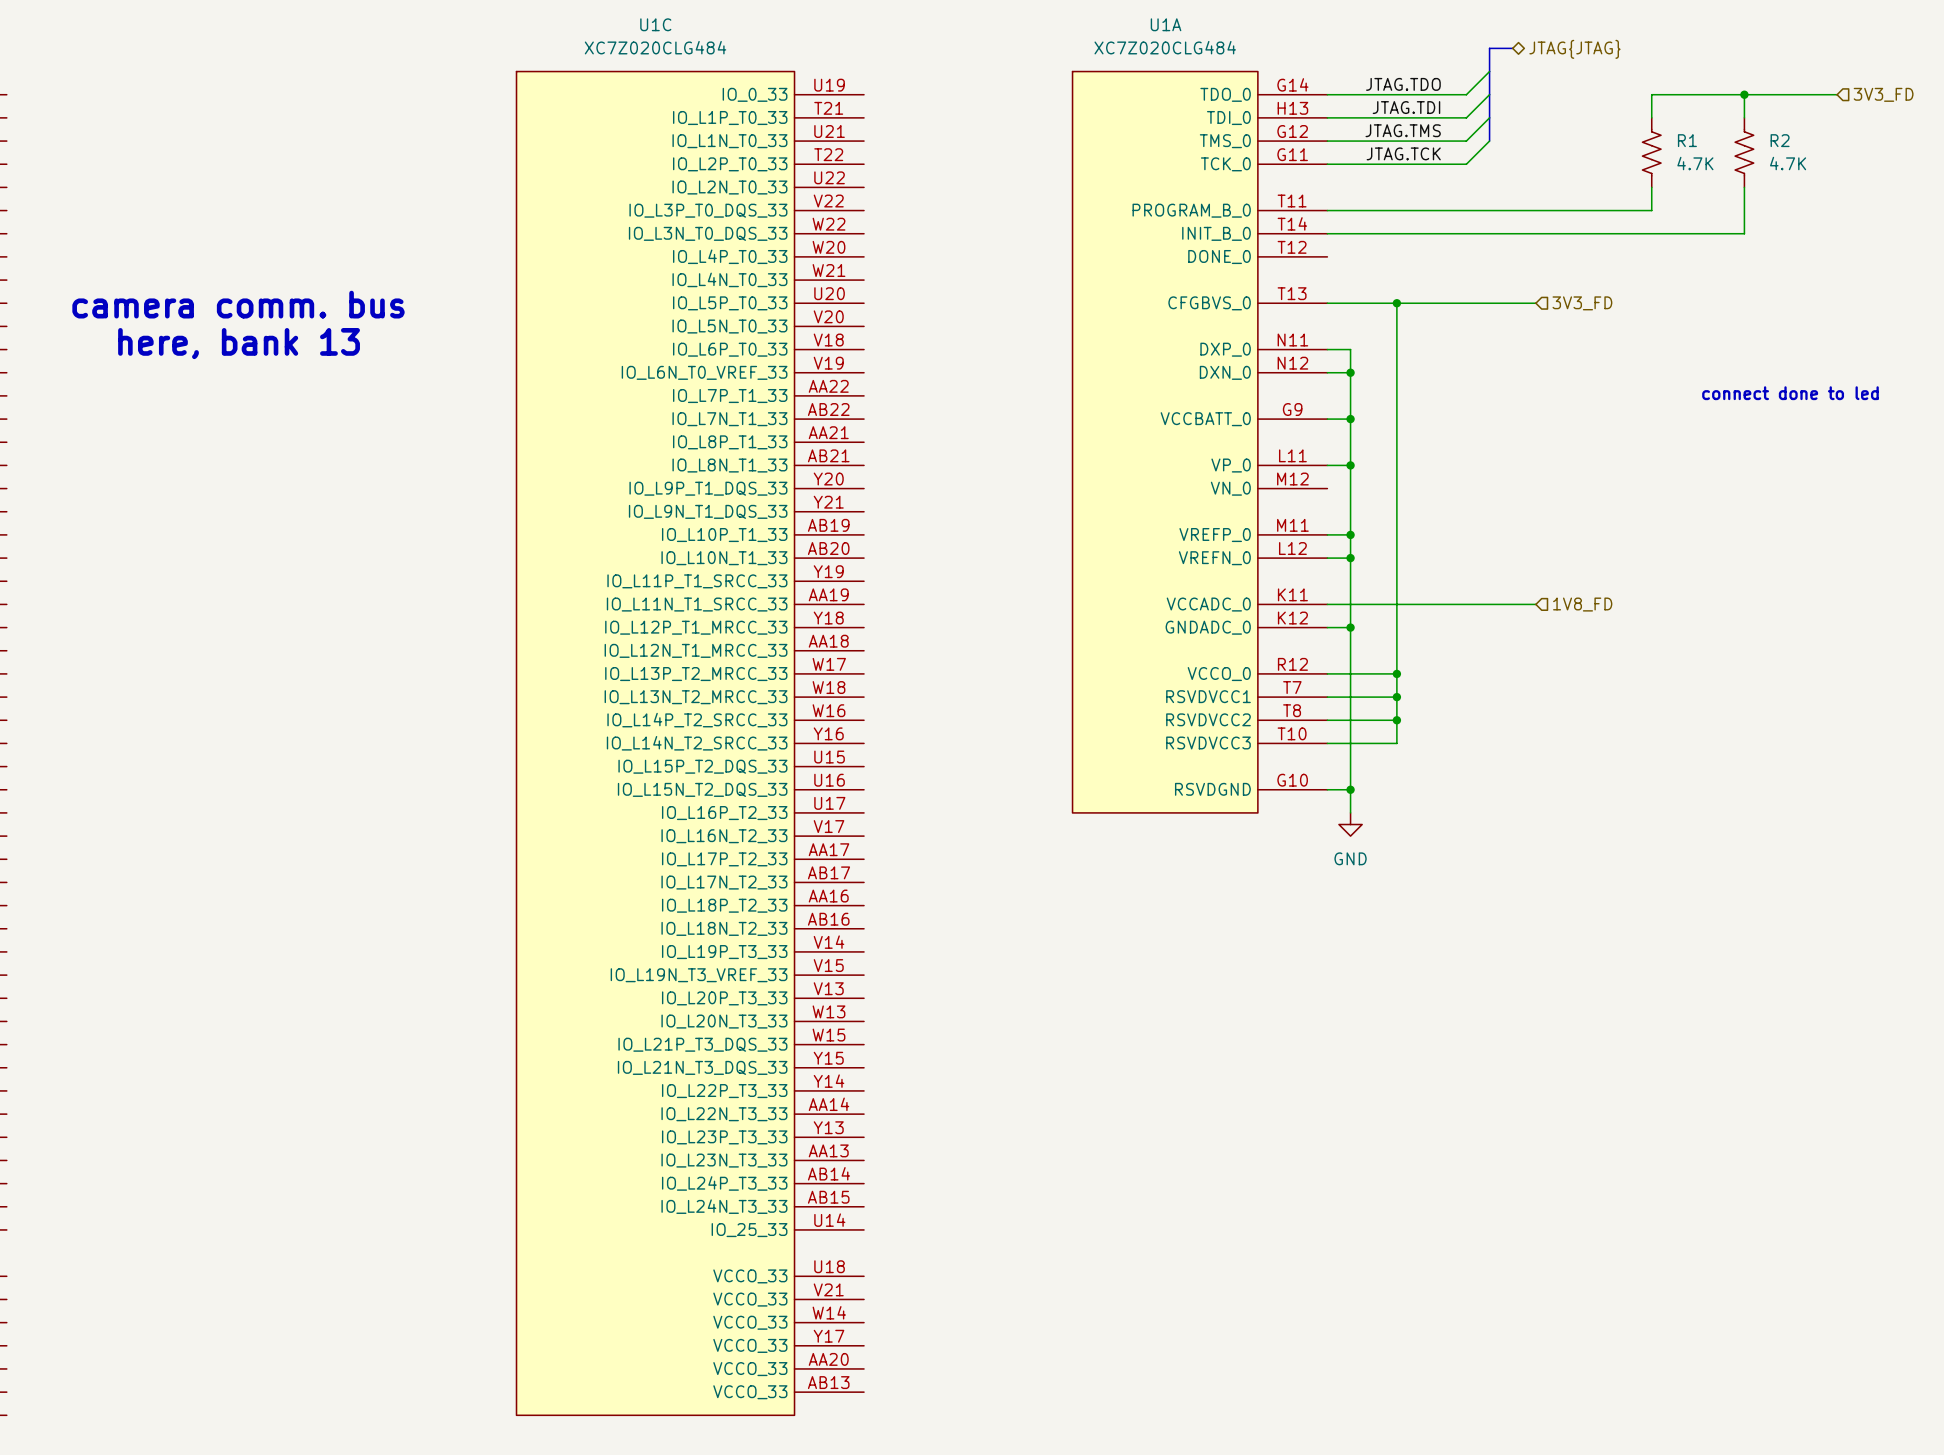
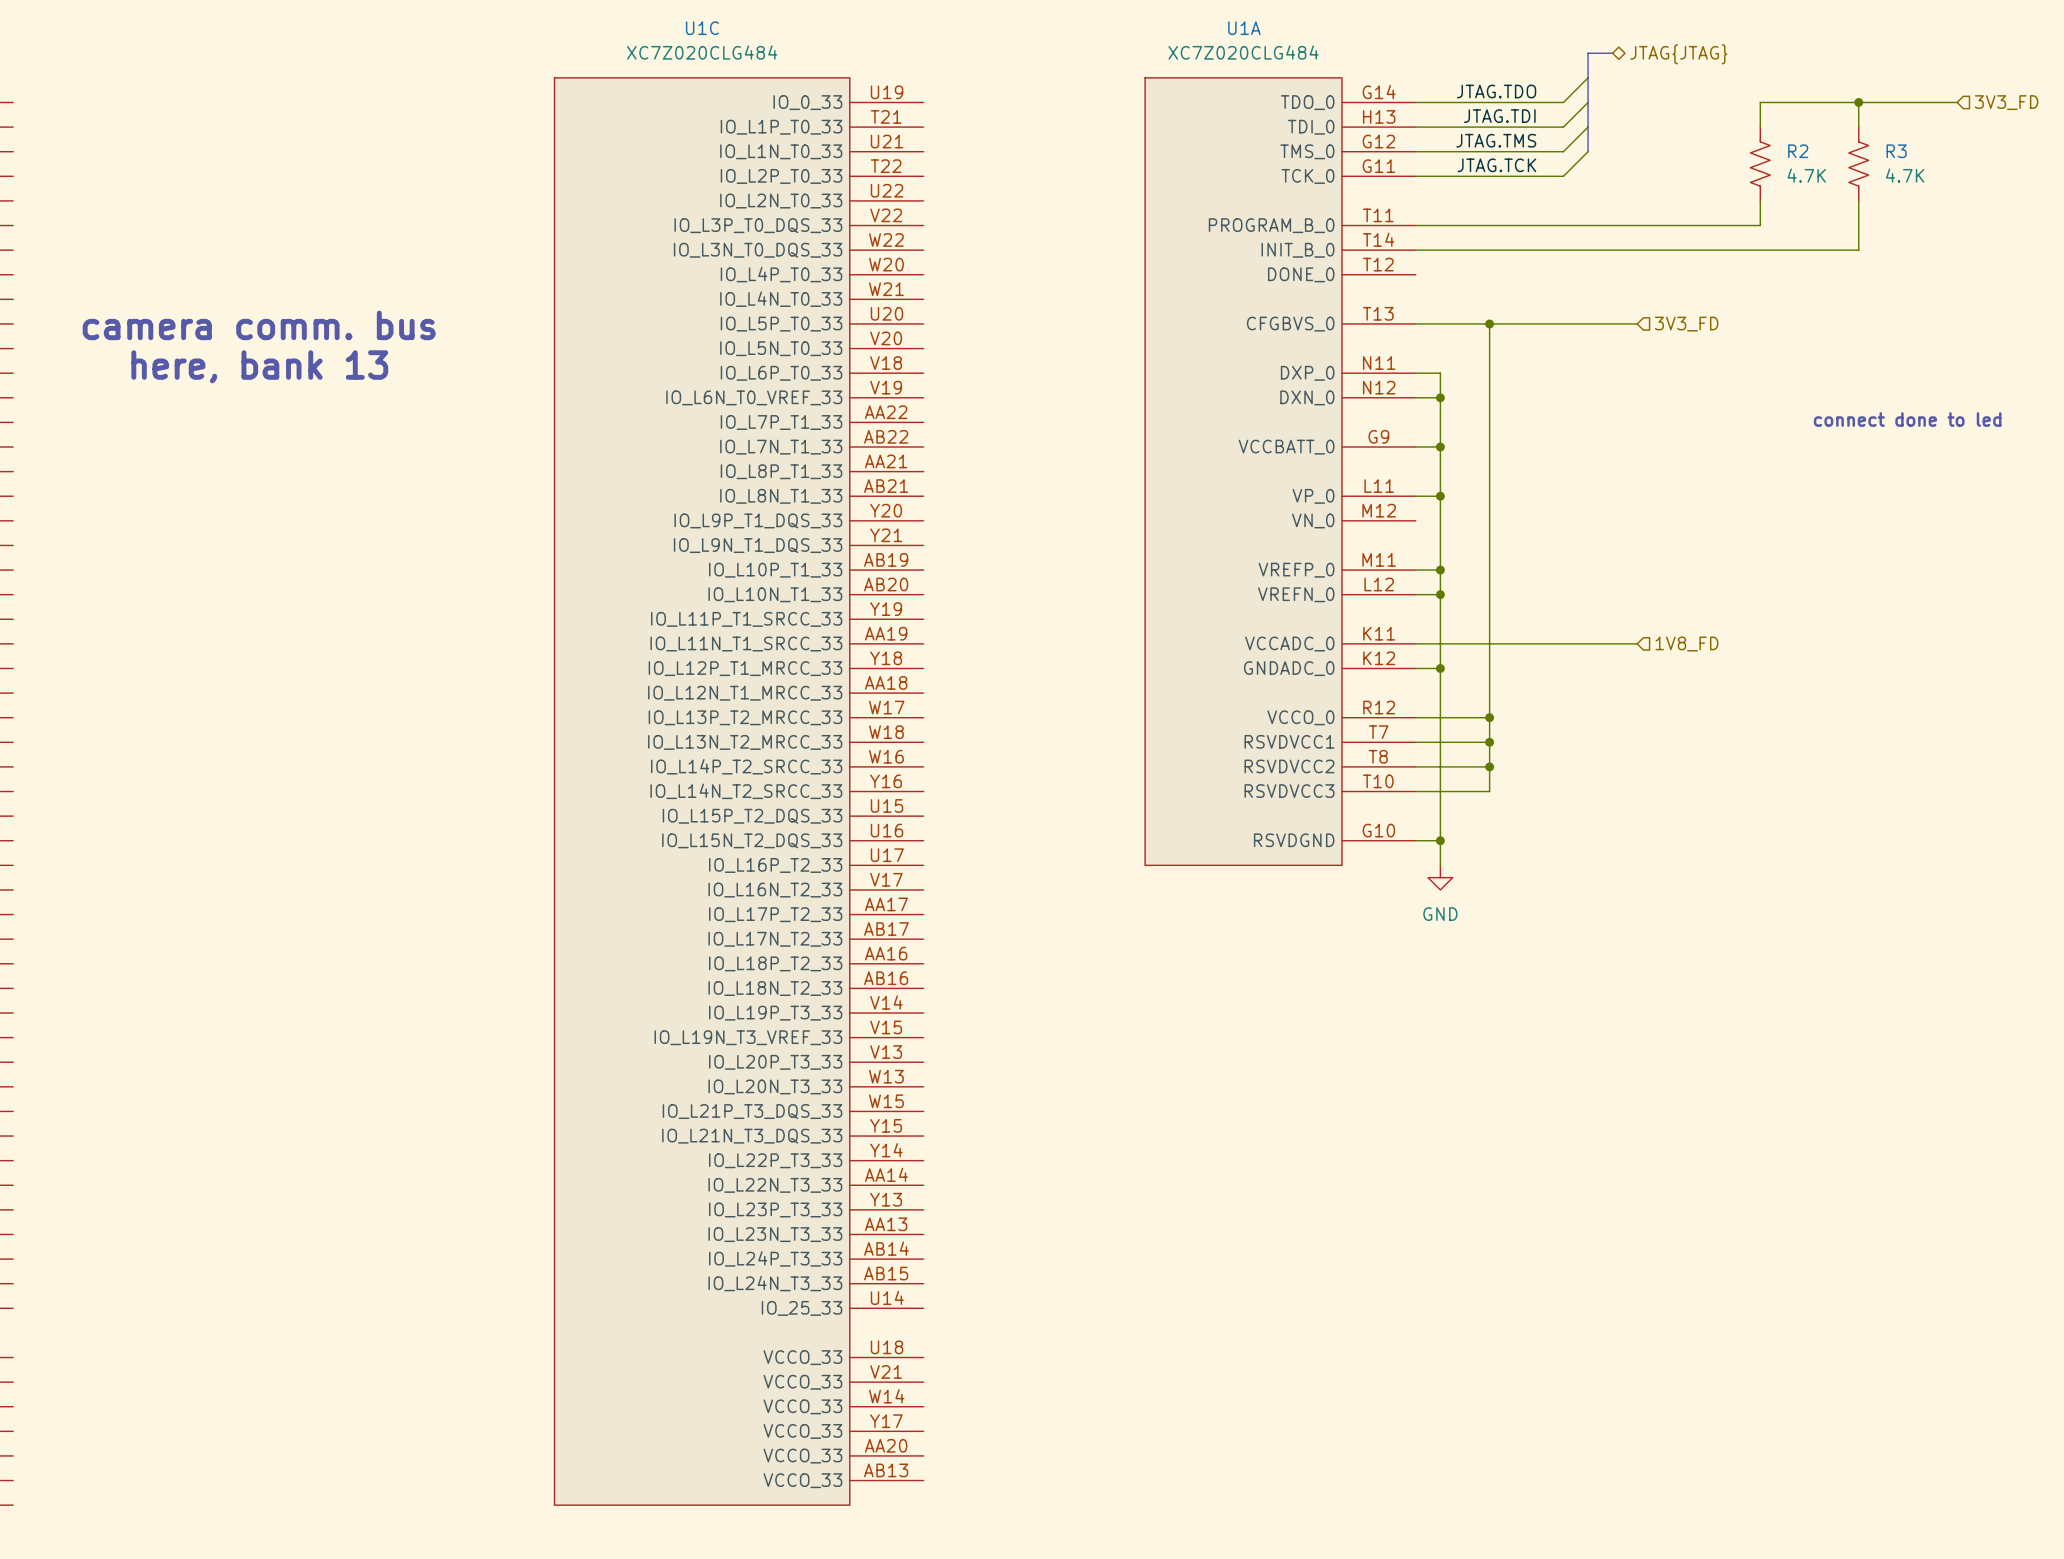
R1 name: R1 (1687, 140) -> R2 (1798, 151)
R2 name: R2 (1780, 140) -> R3 (1896, 151)

